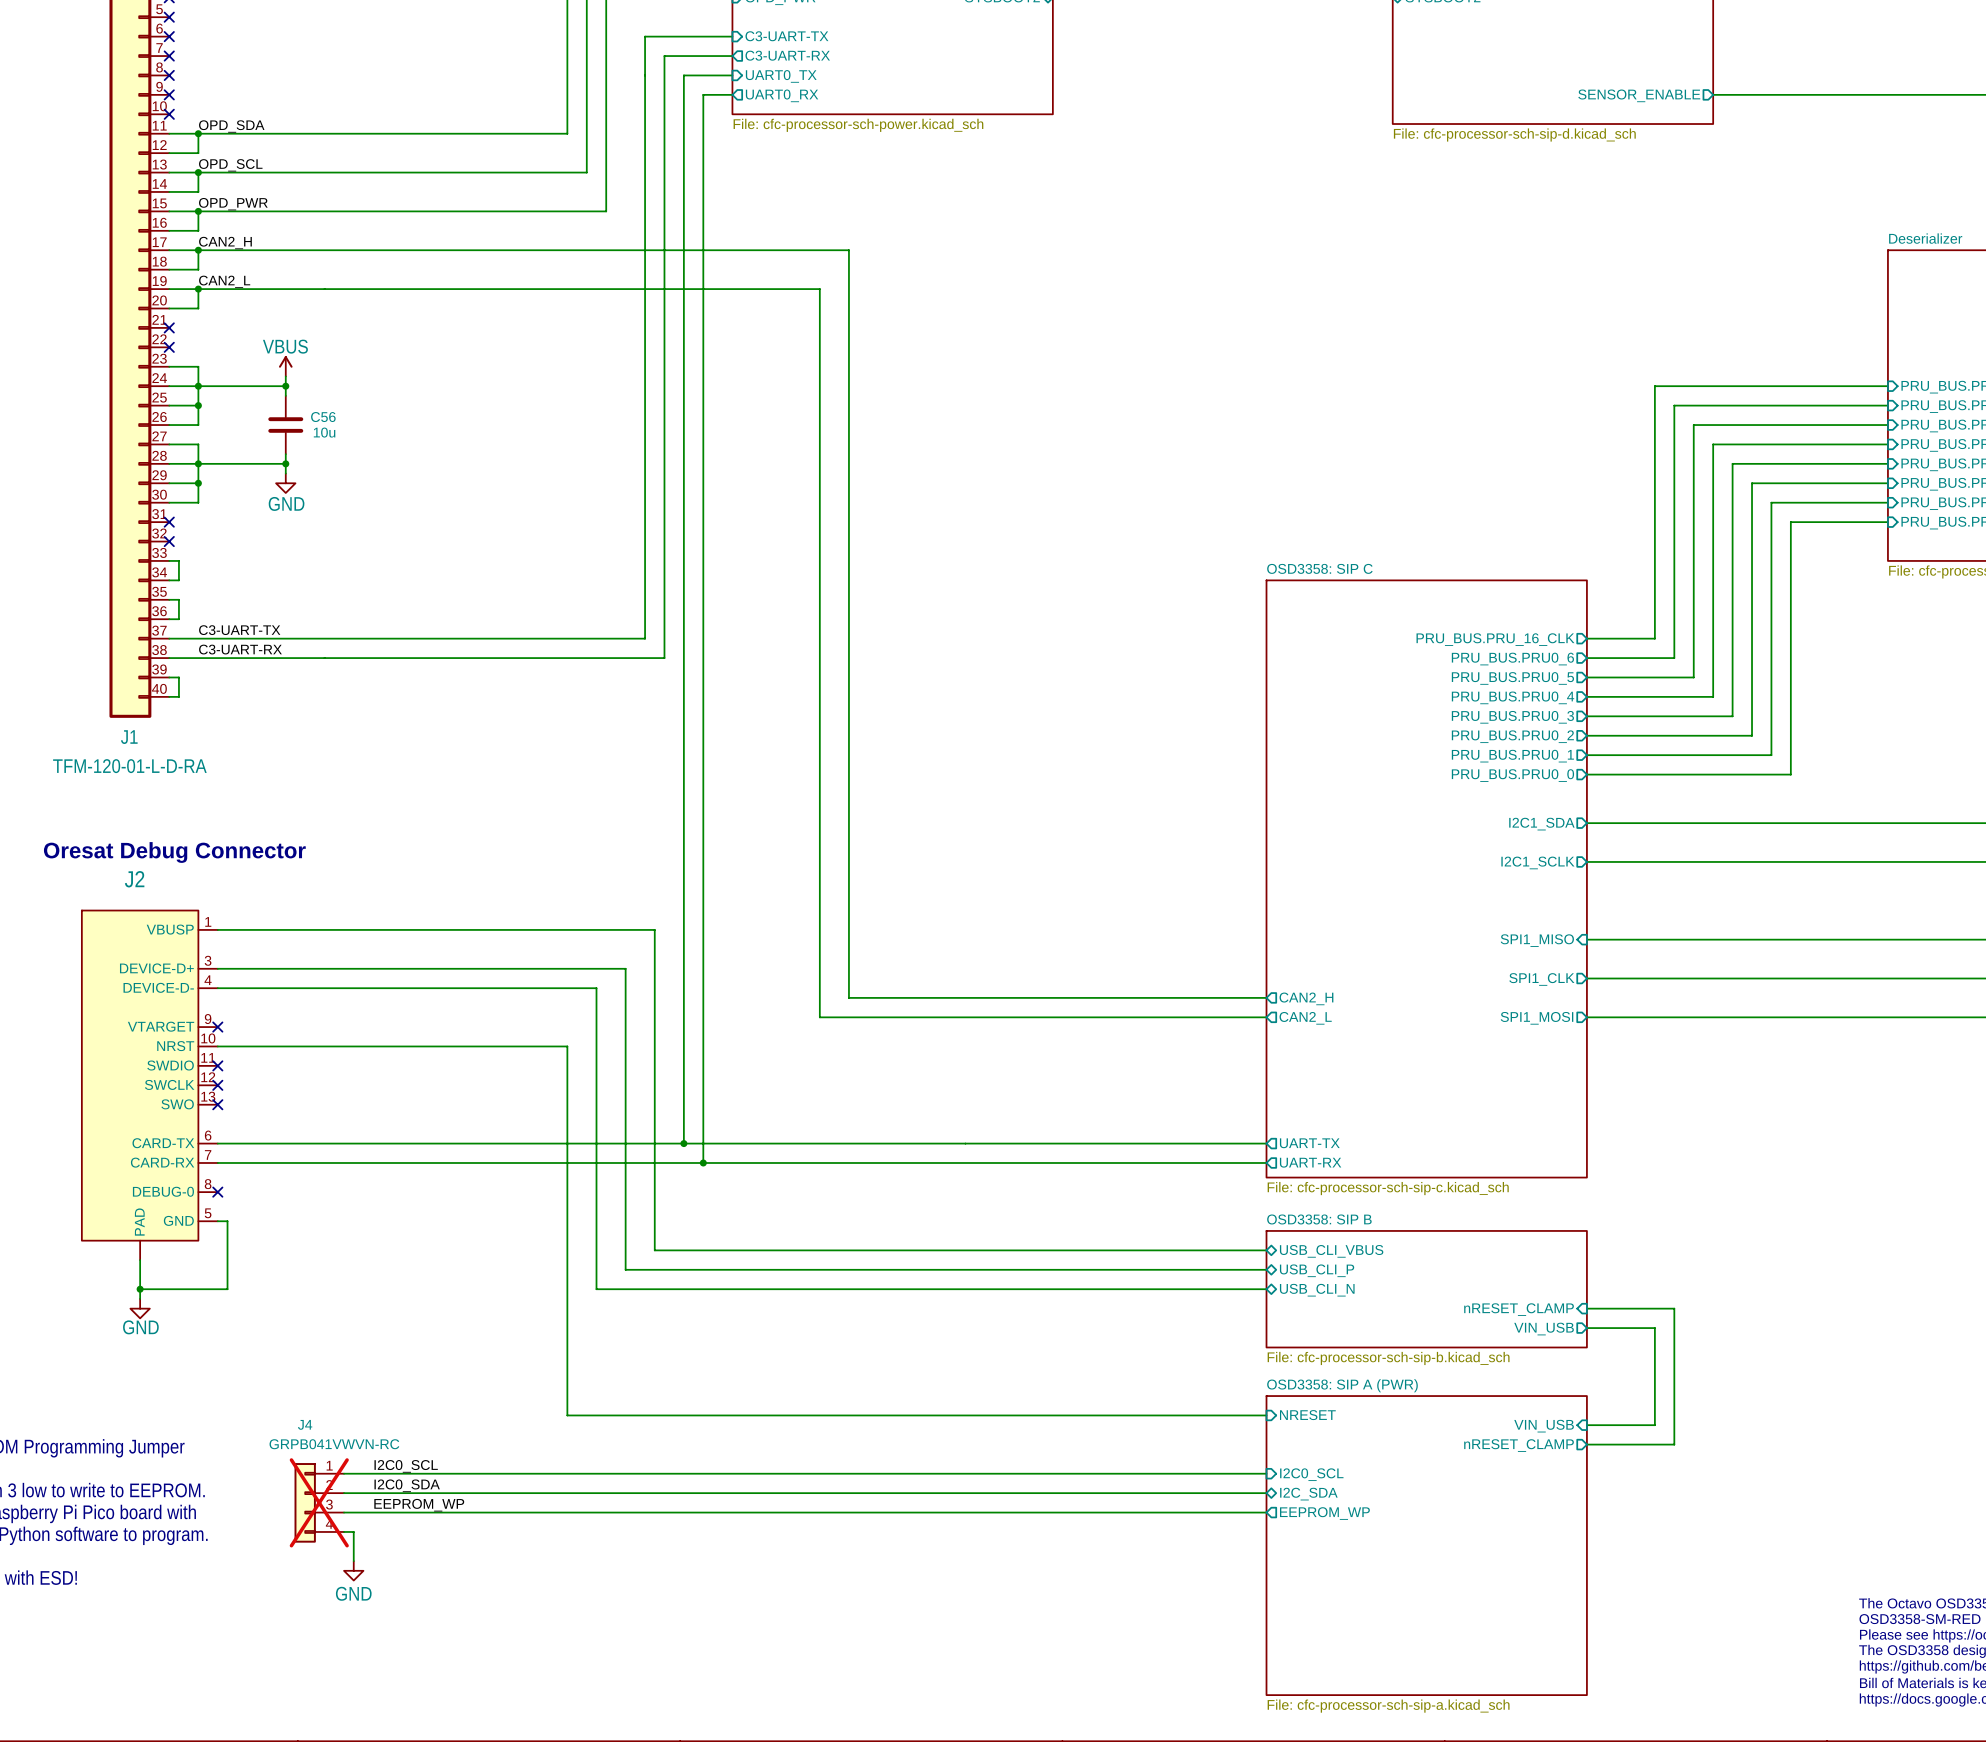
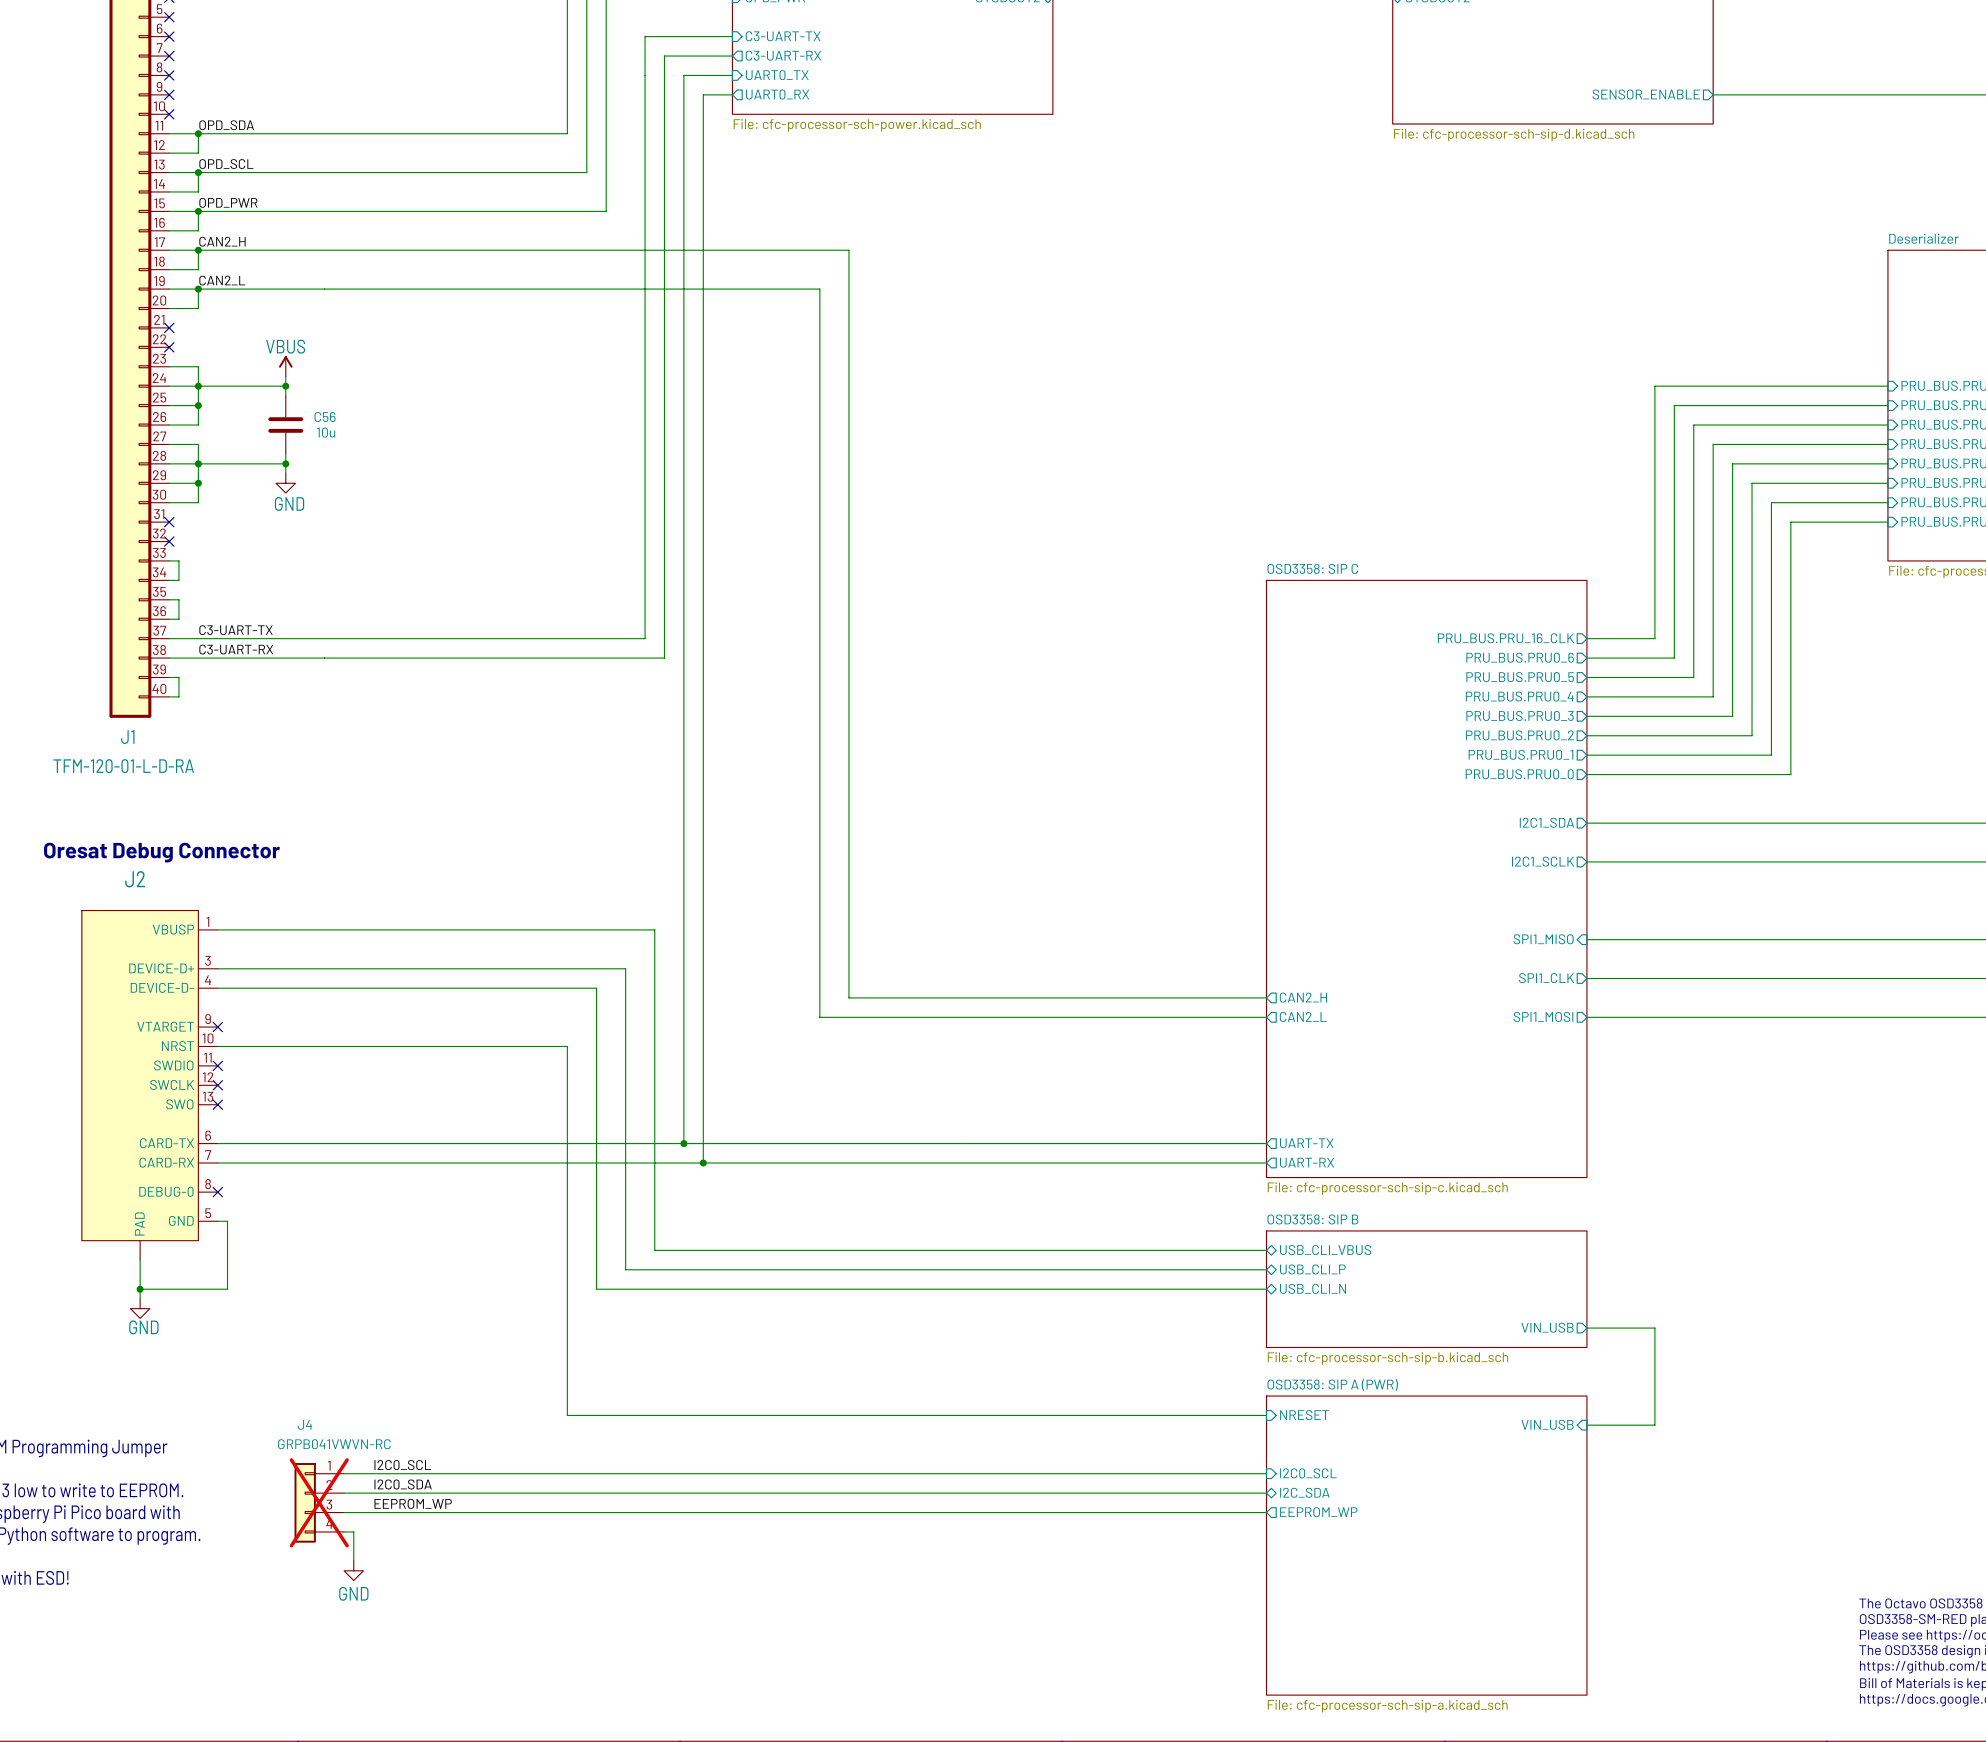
wire: (1586, 1308) (1674, 1308) (1674, 1444) (1586, 1444) -> none
sheet pin: nRESET_CLAMP (1519, 1309) -> none
sheet pin: nRESET_CLAMP (1519, 1445) -> none

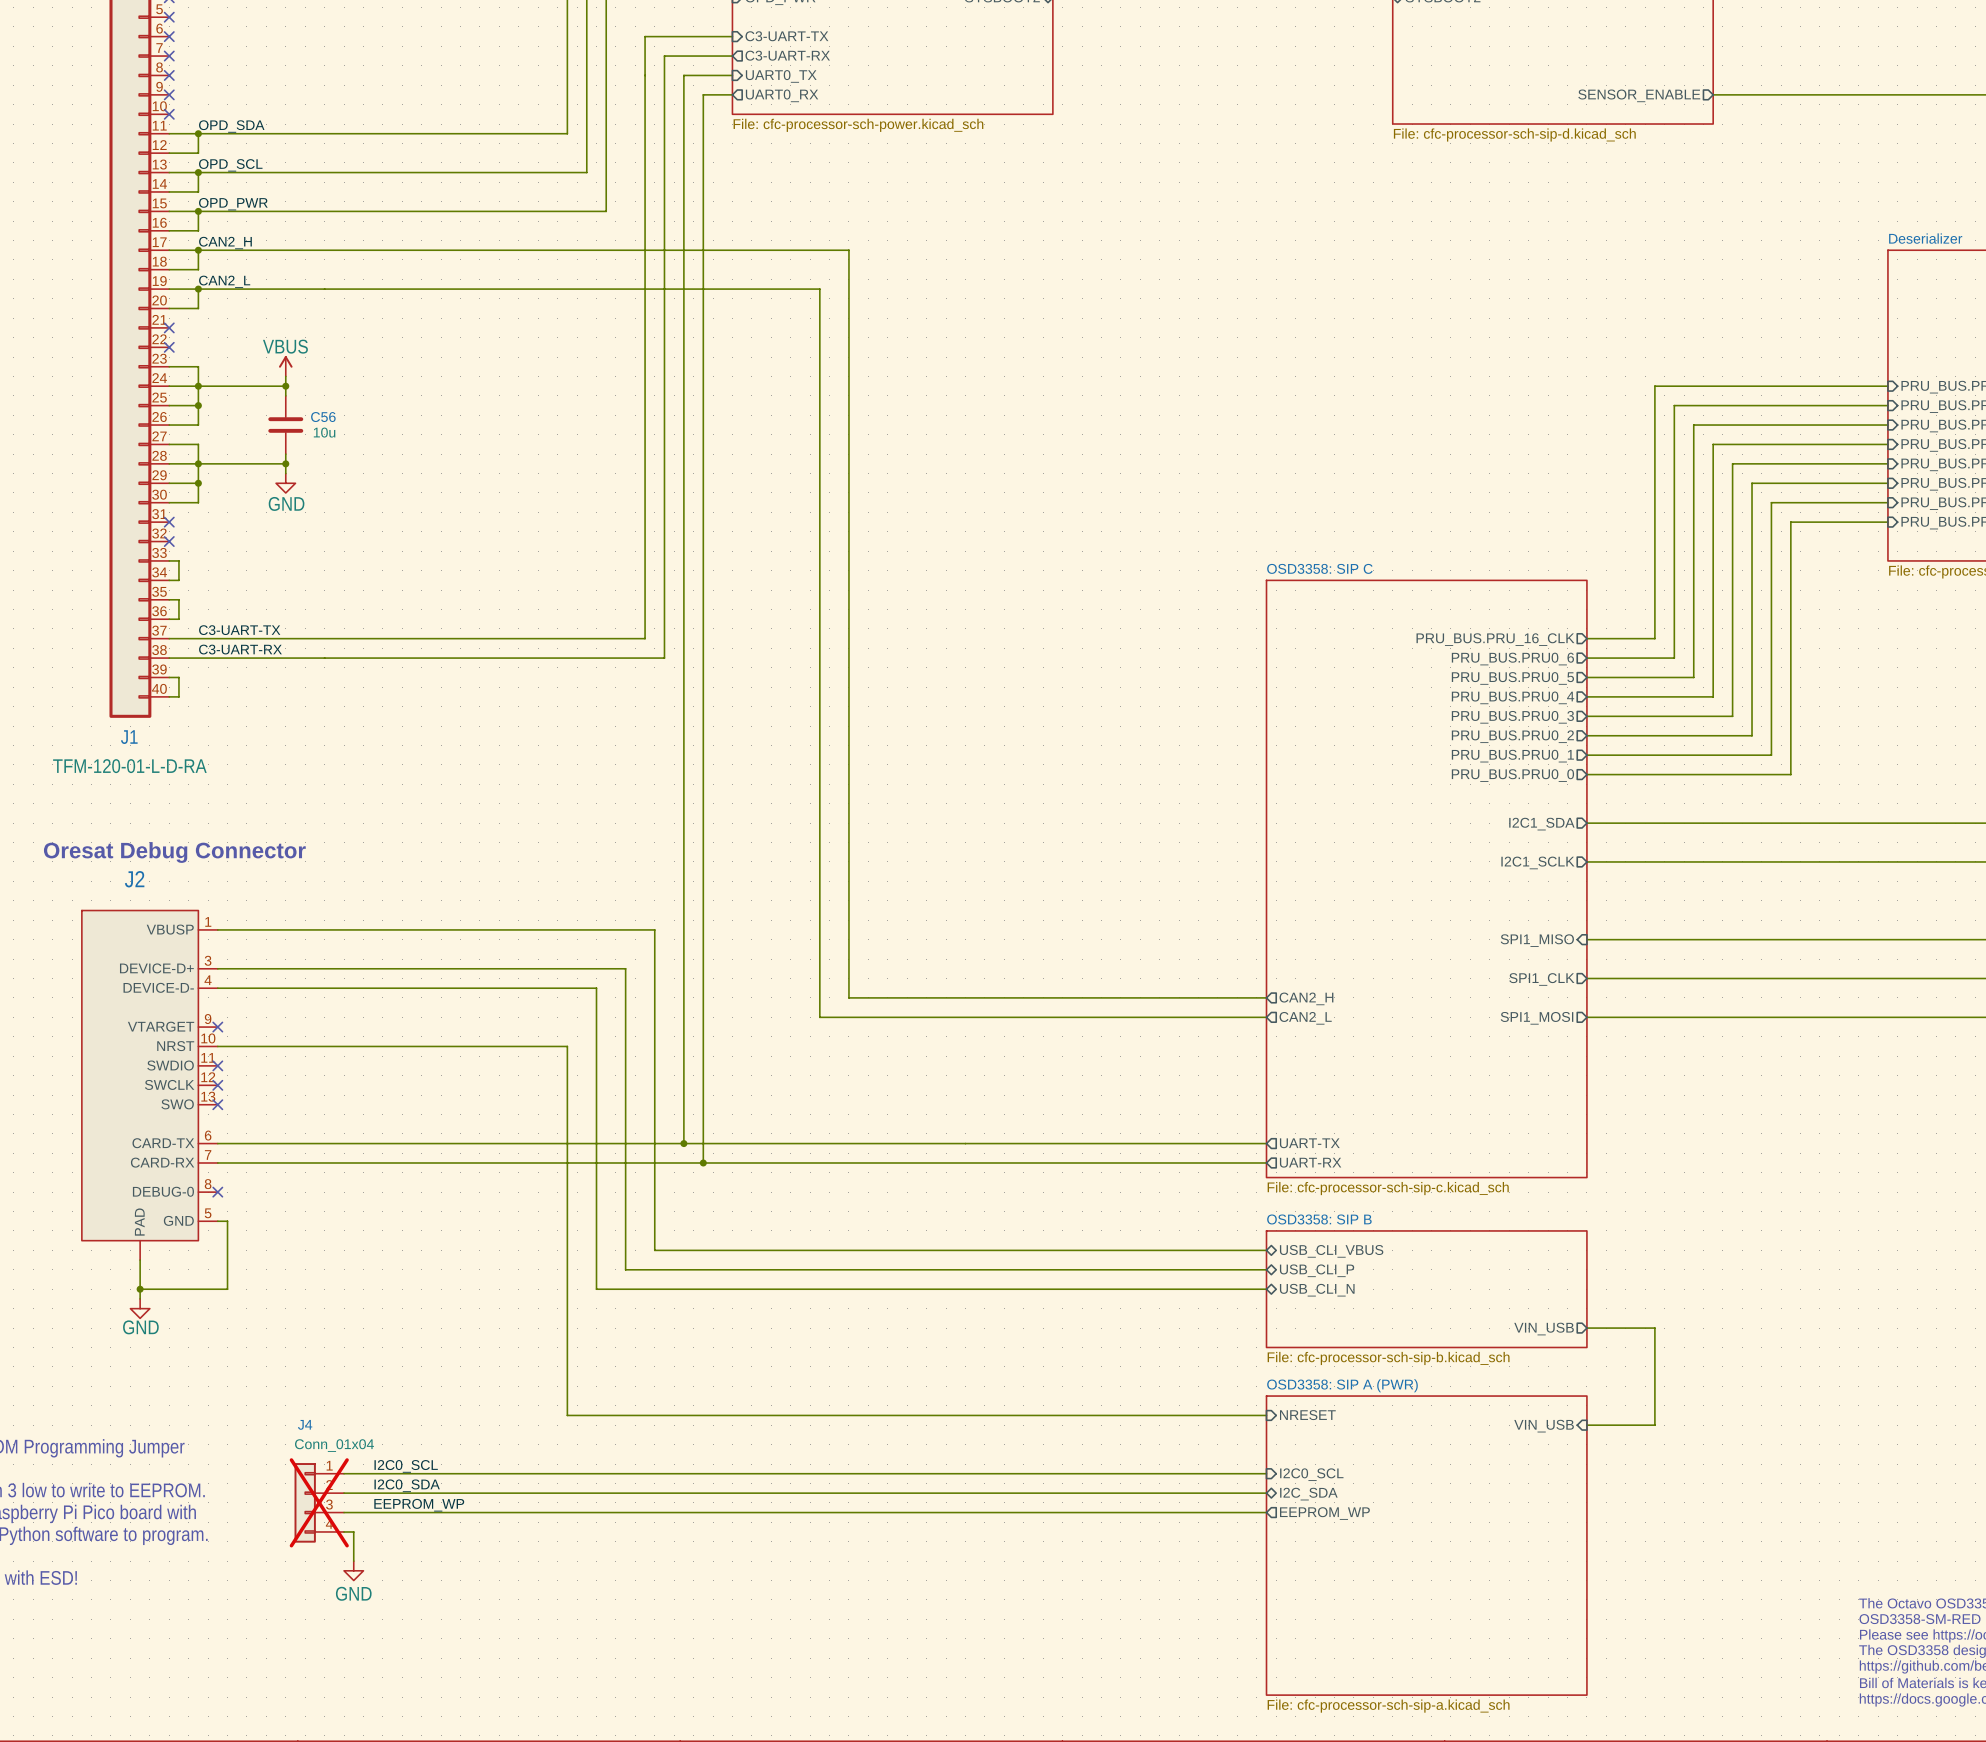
J4 value: GRPB041VWVN-RC (334, 1444) -> Conn_01x04 (334, 1445)

